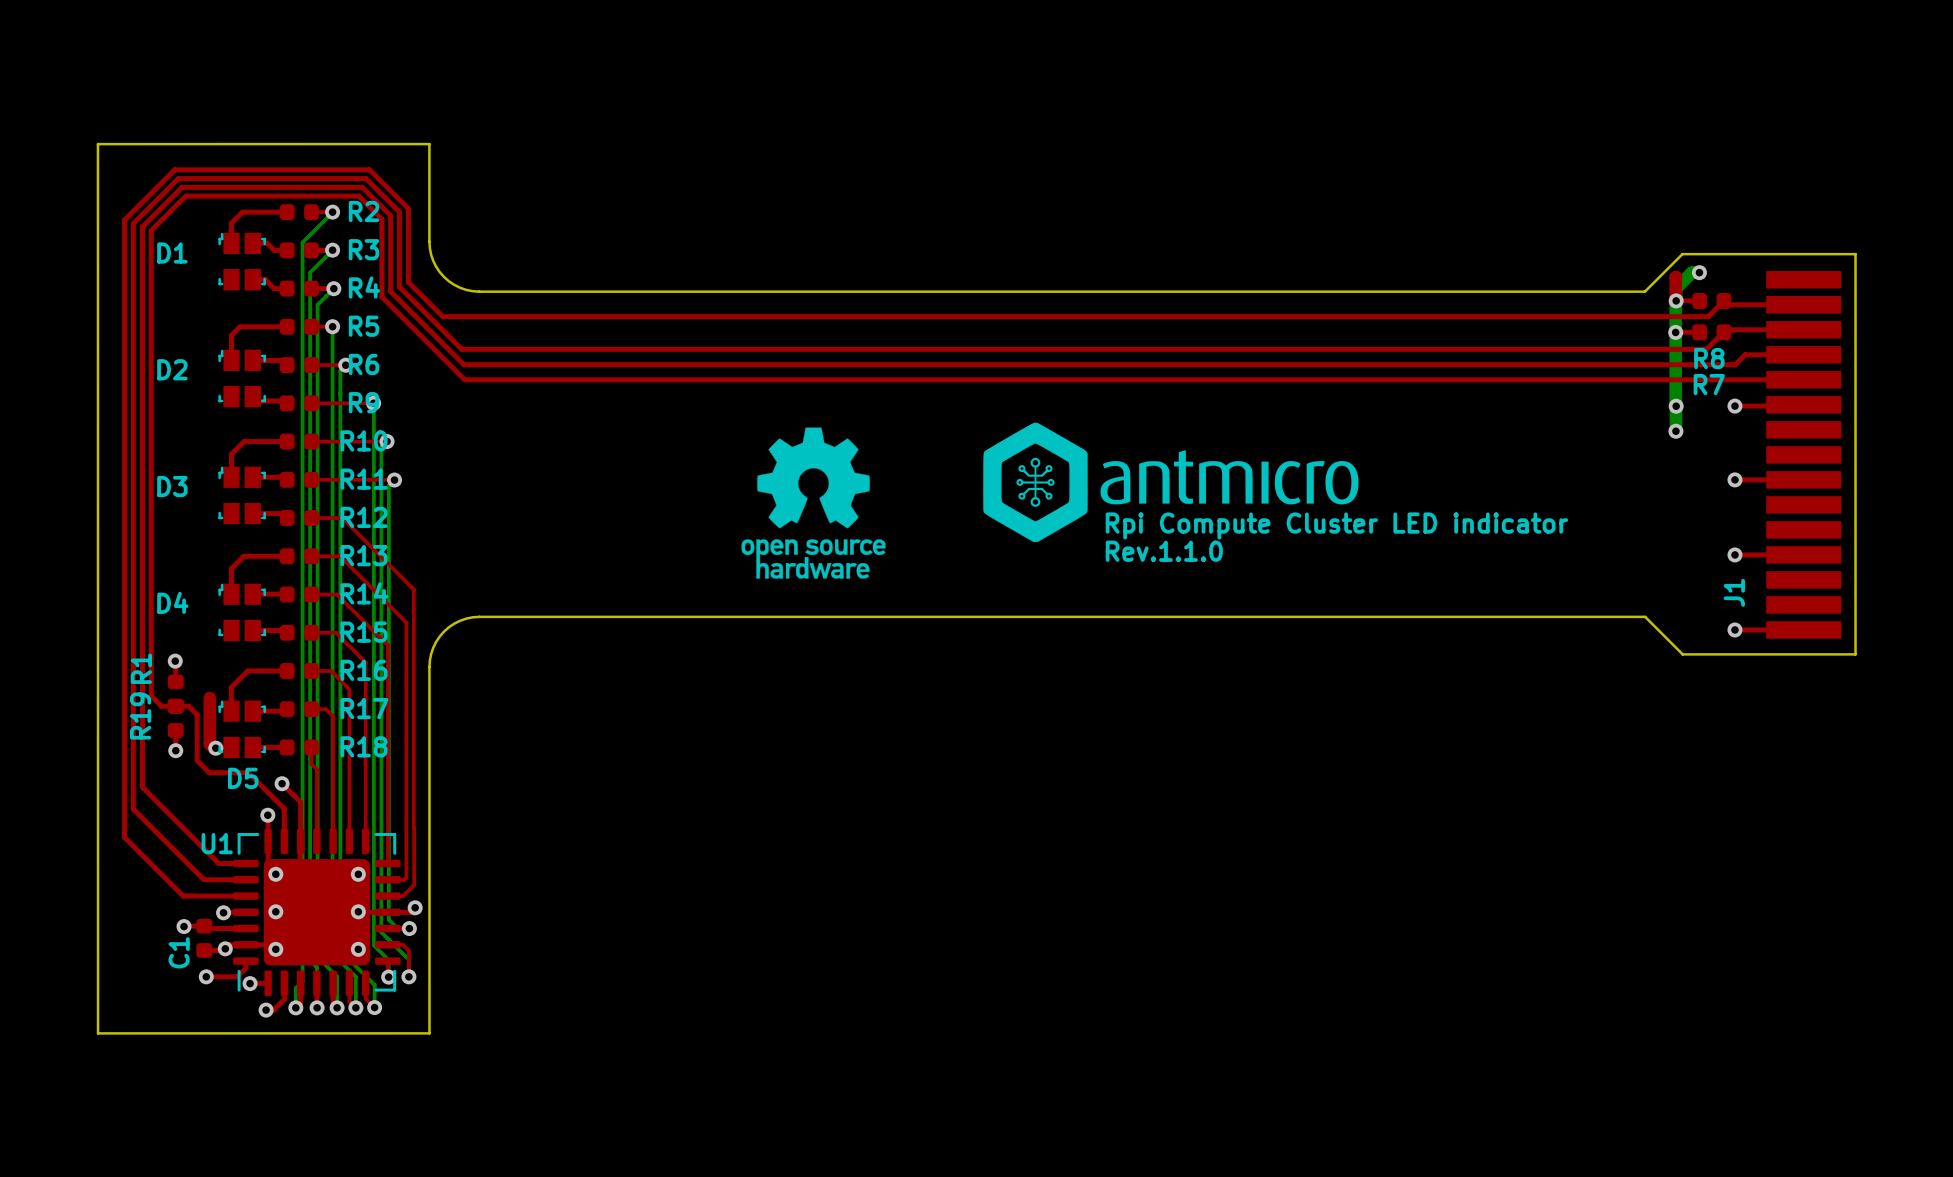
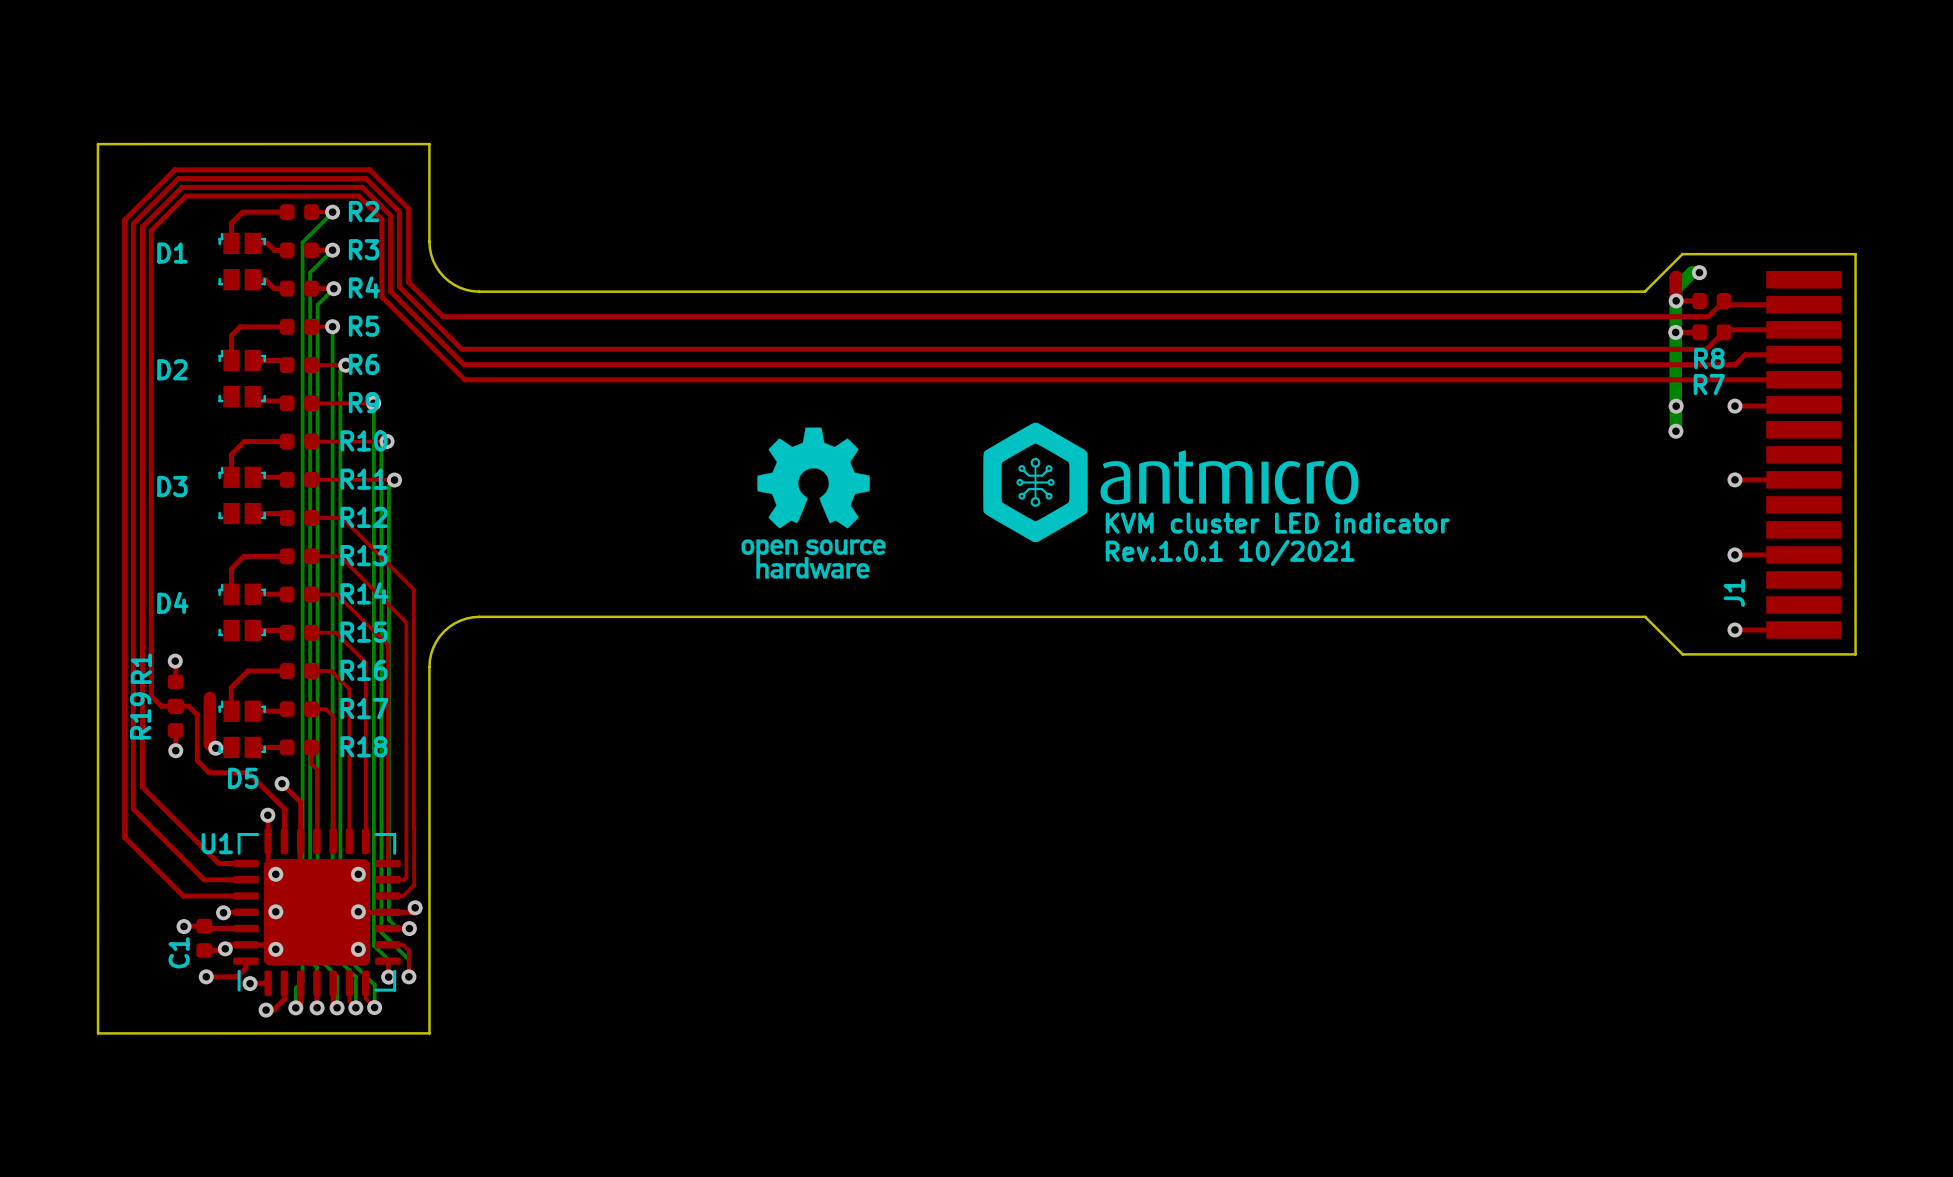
text: Rpi Compute Cluster LED indicator (1336, 525) -> KVM cluster LED indicator (1277, 523)
text: Rev.1.1.0 (1164, 551) -> Rev.1.0.1 10/2021 (1230, 552)

